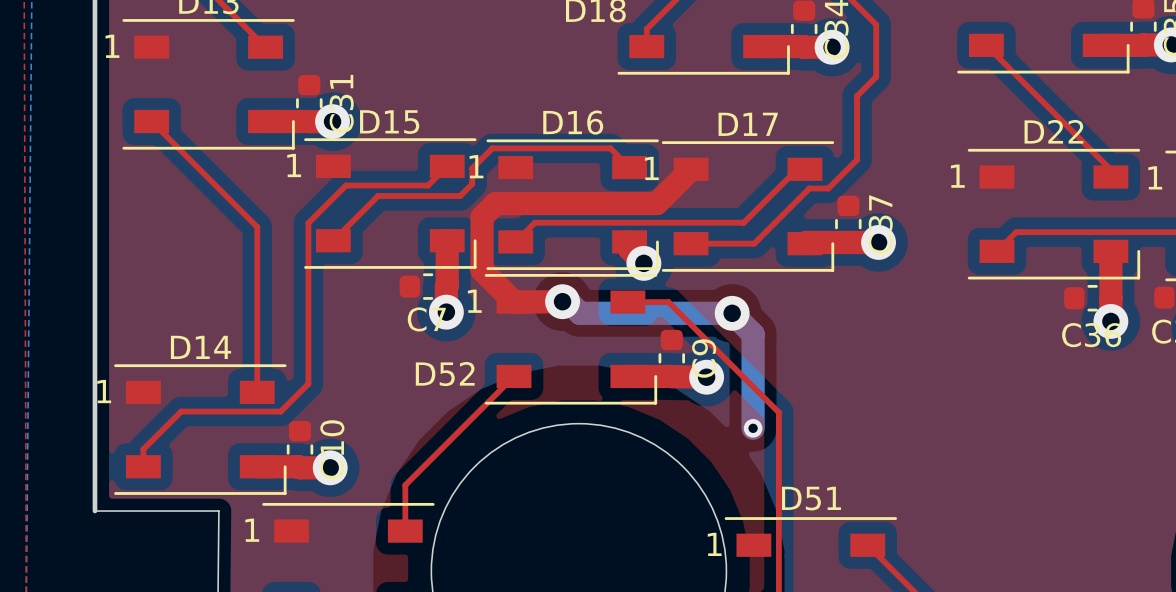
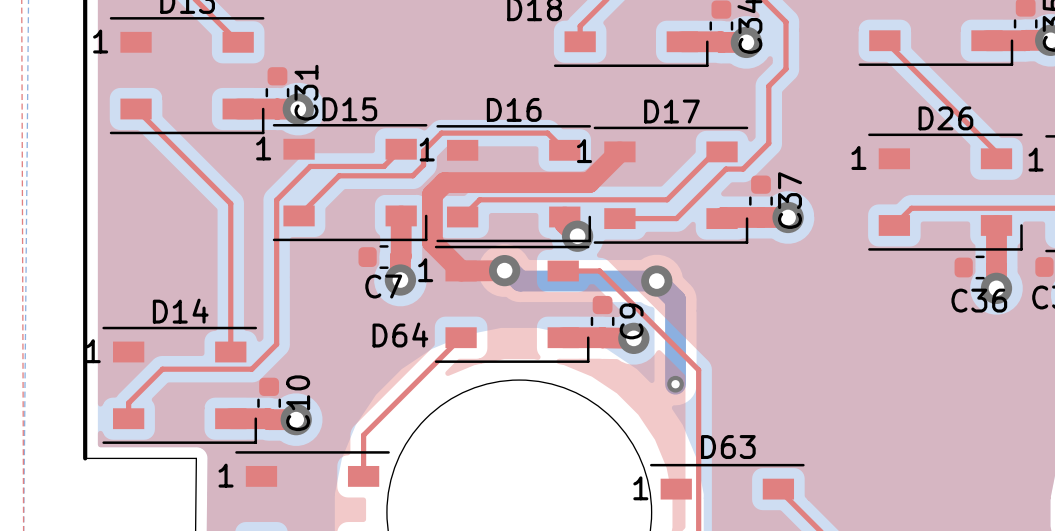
D22 name: D22 (1053, 131) -> D26 (945, 118)
D52 name: D52 (445, 374) -> D64 (400, 335)
D51 name: D51 (811, 498) -> D63 (728, 447)

